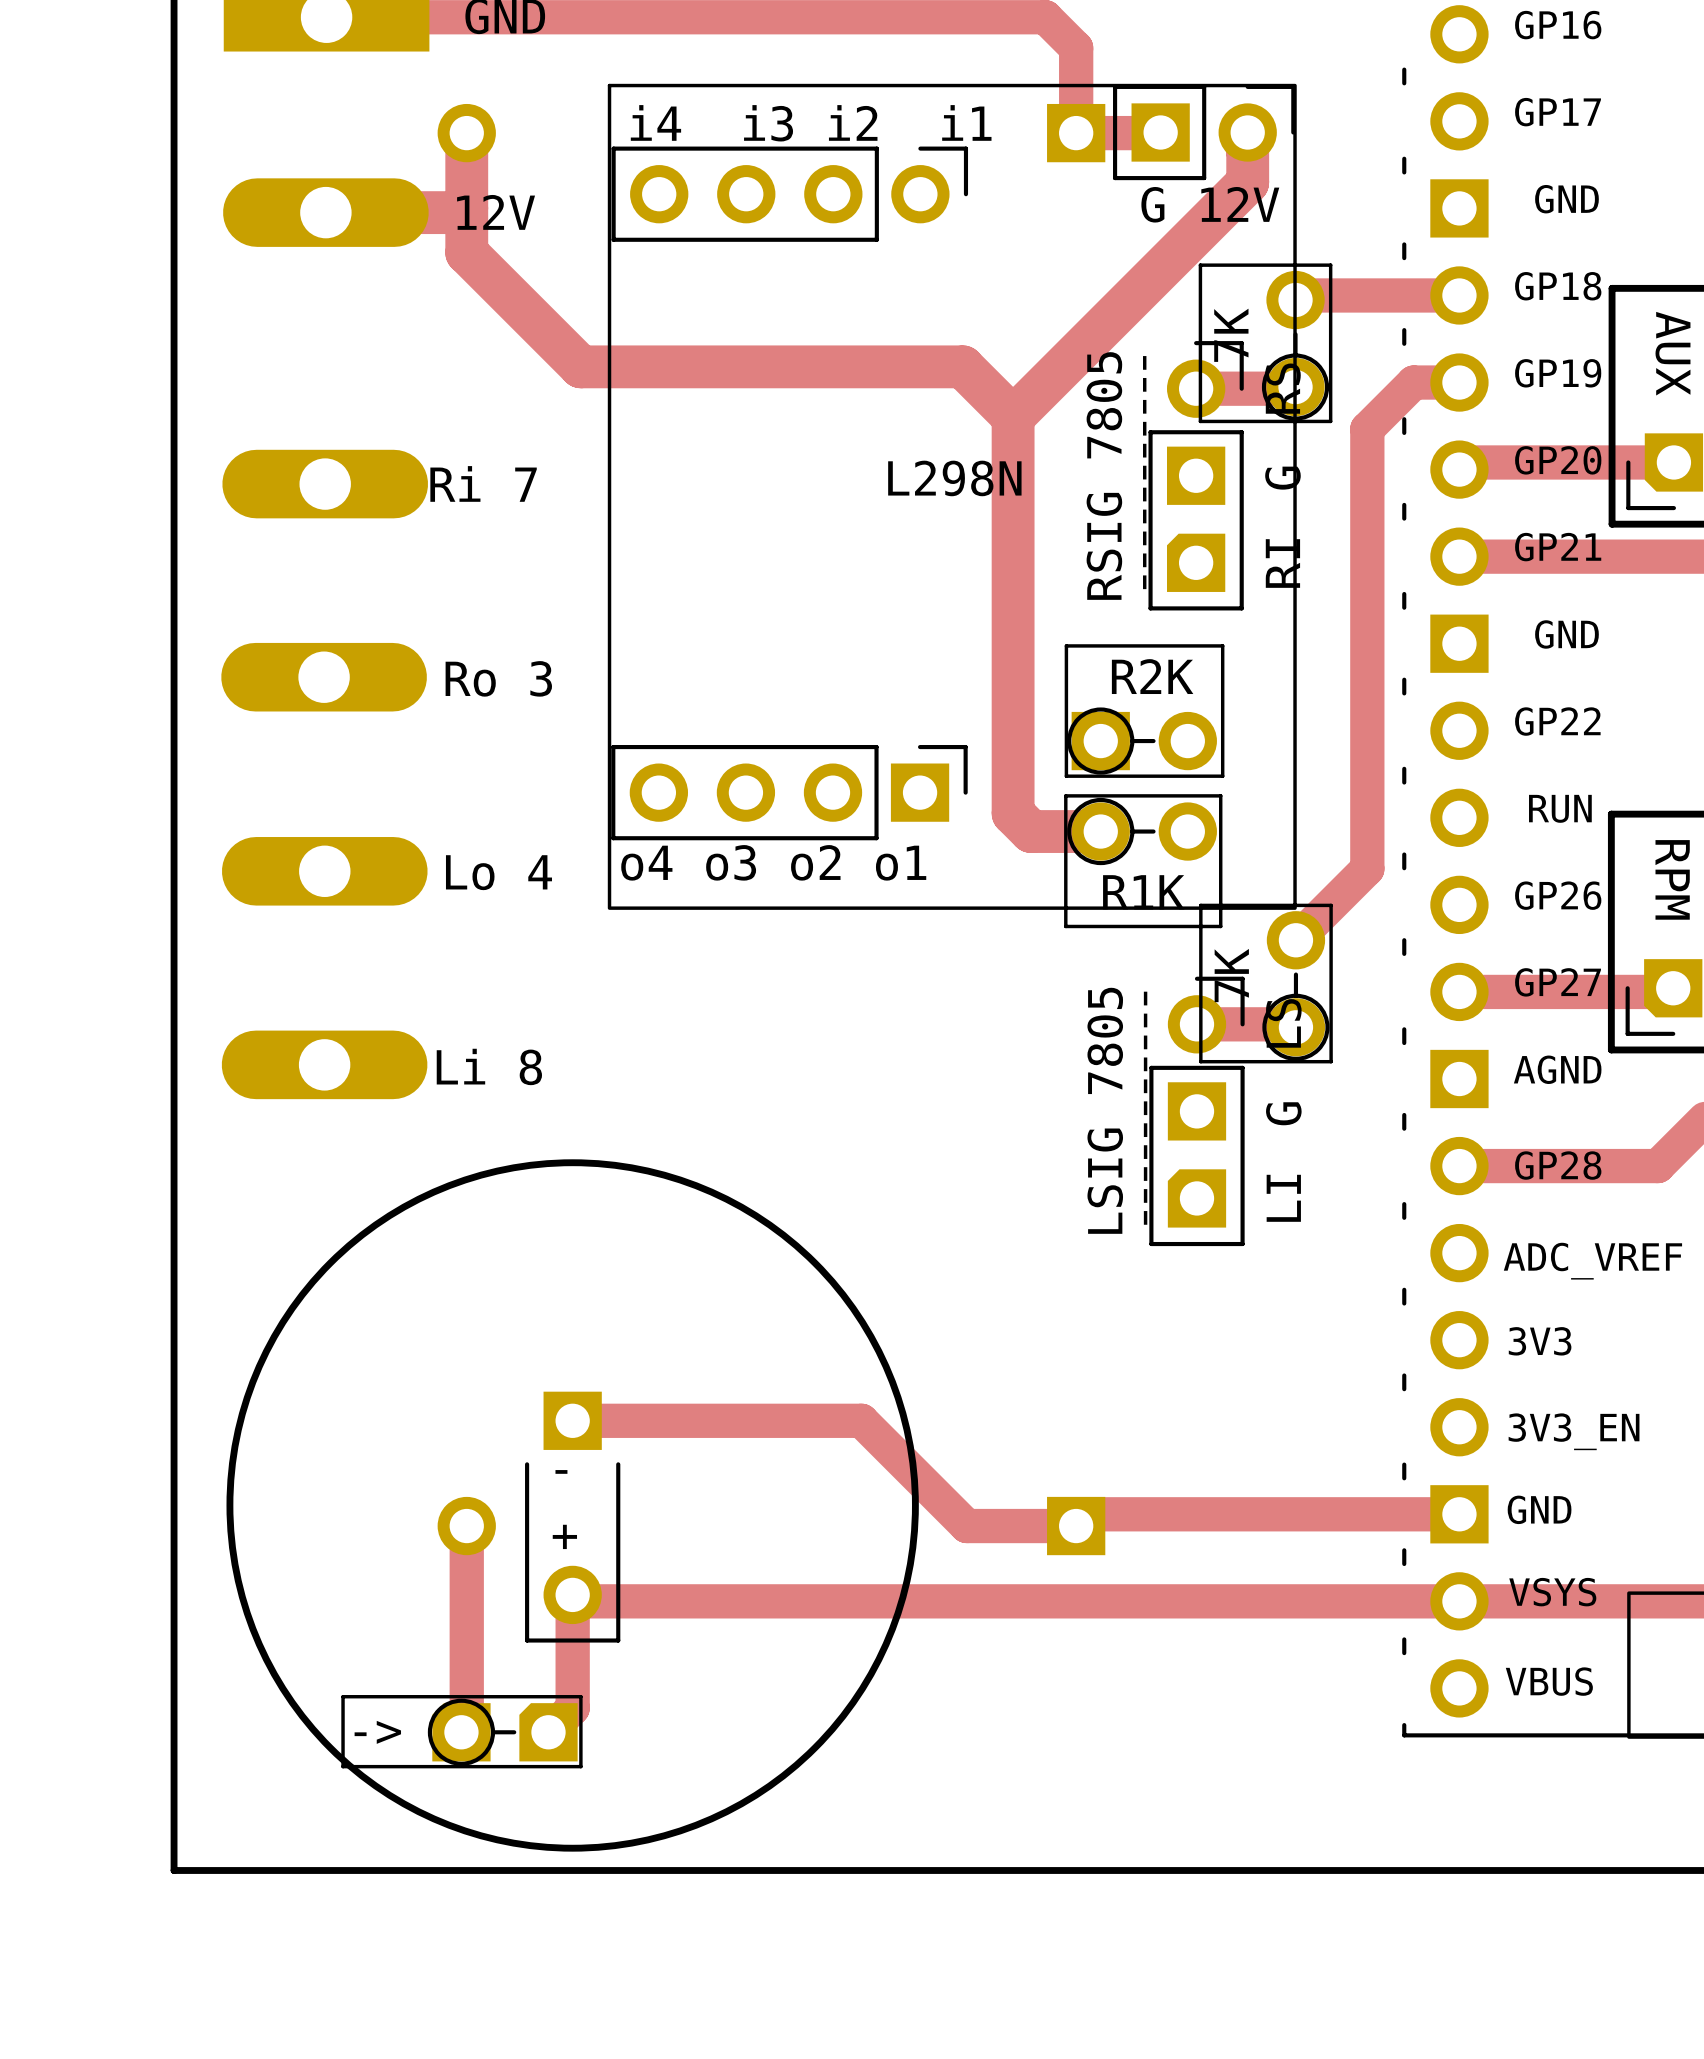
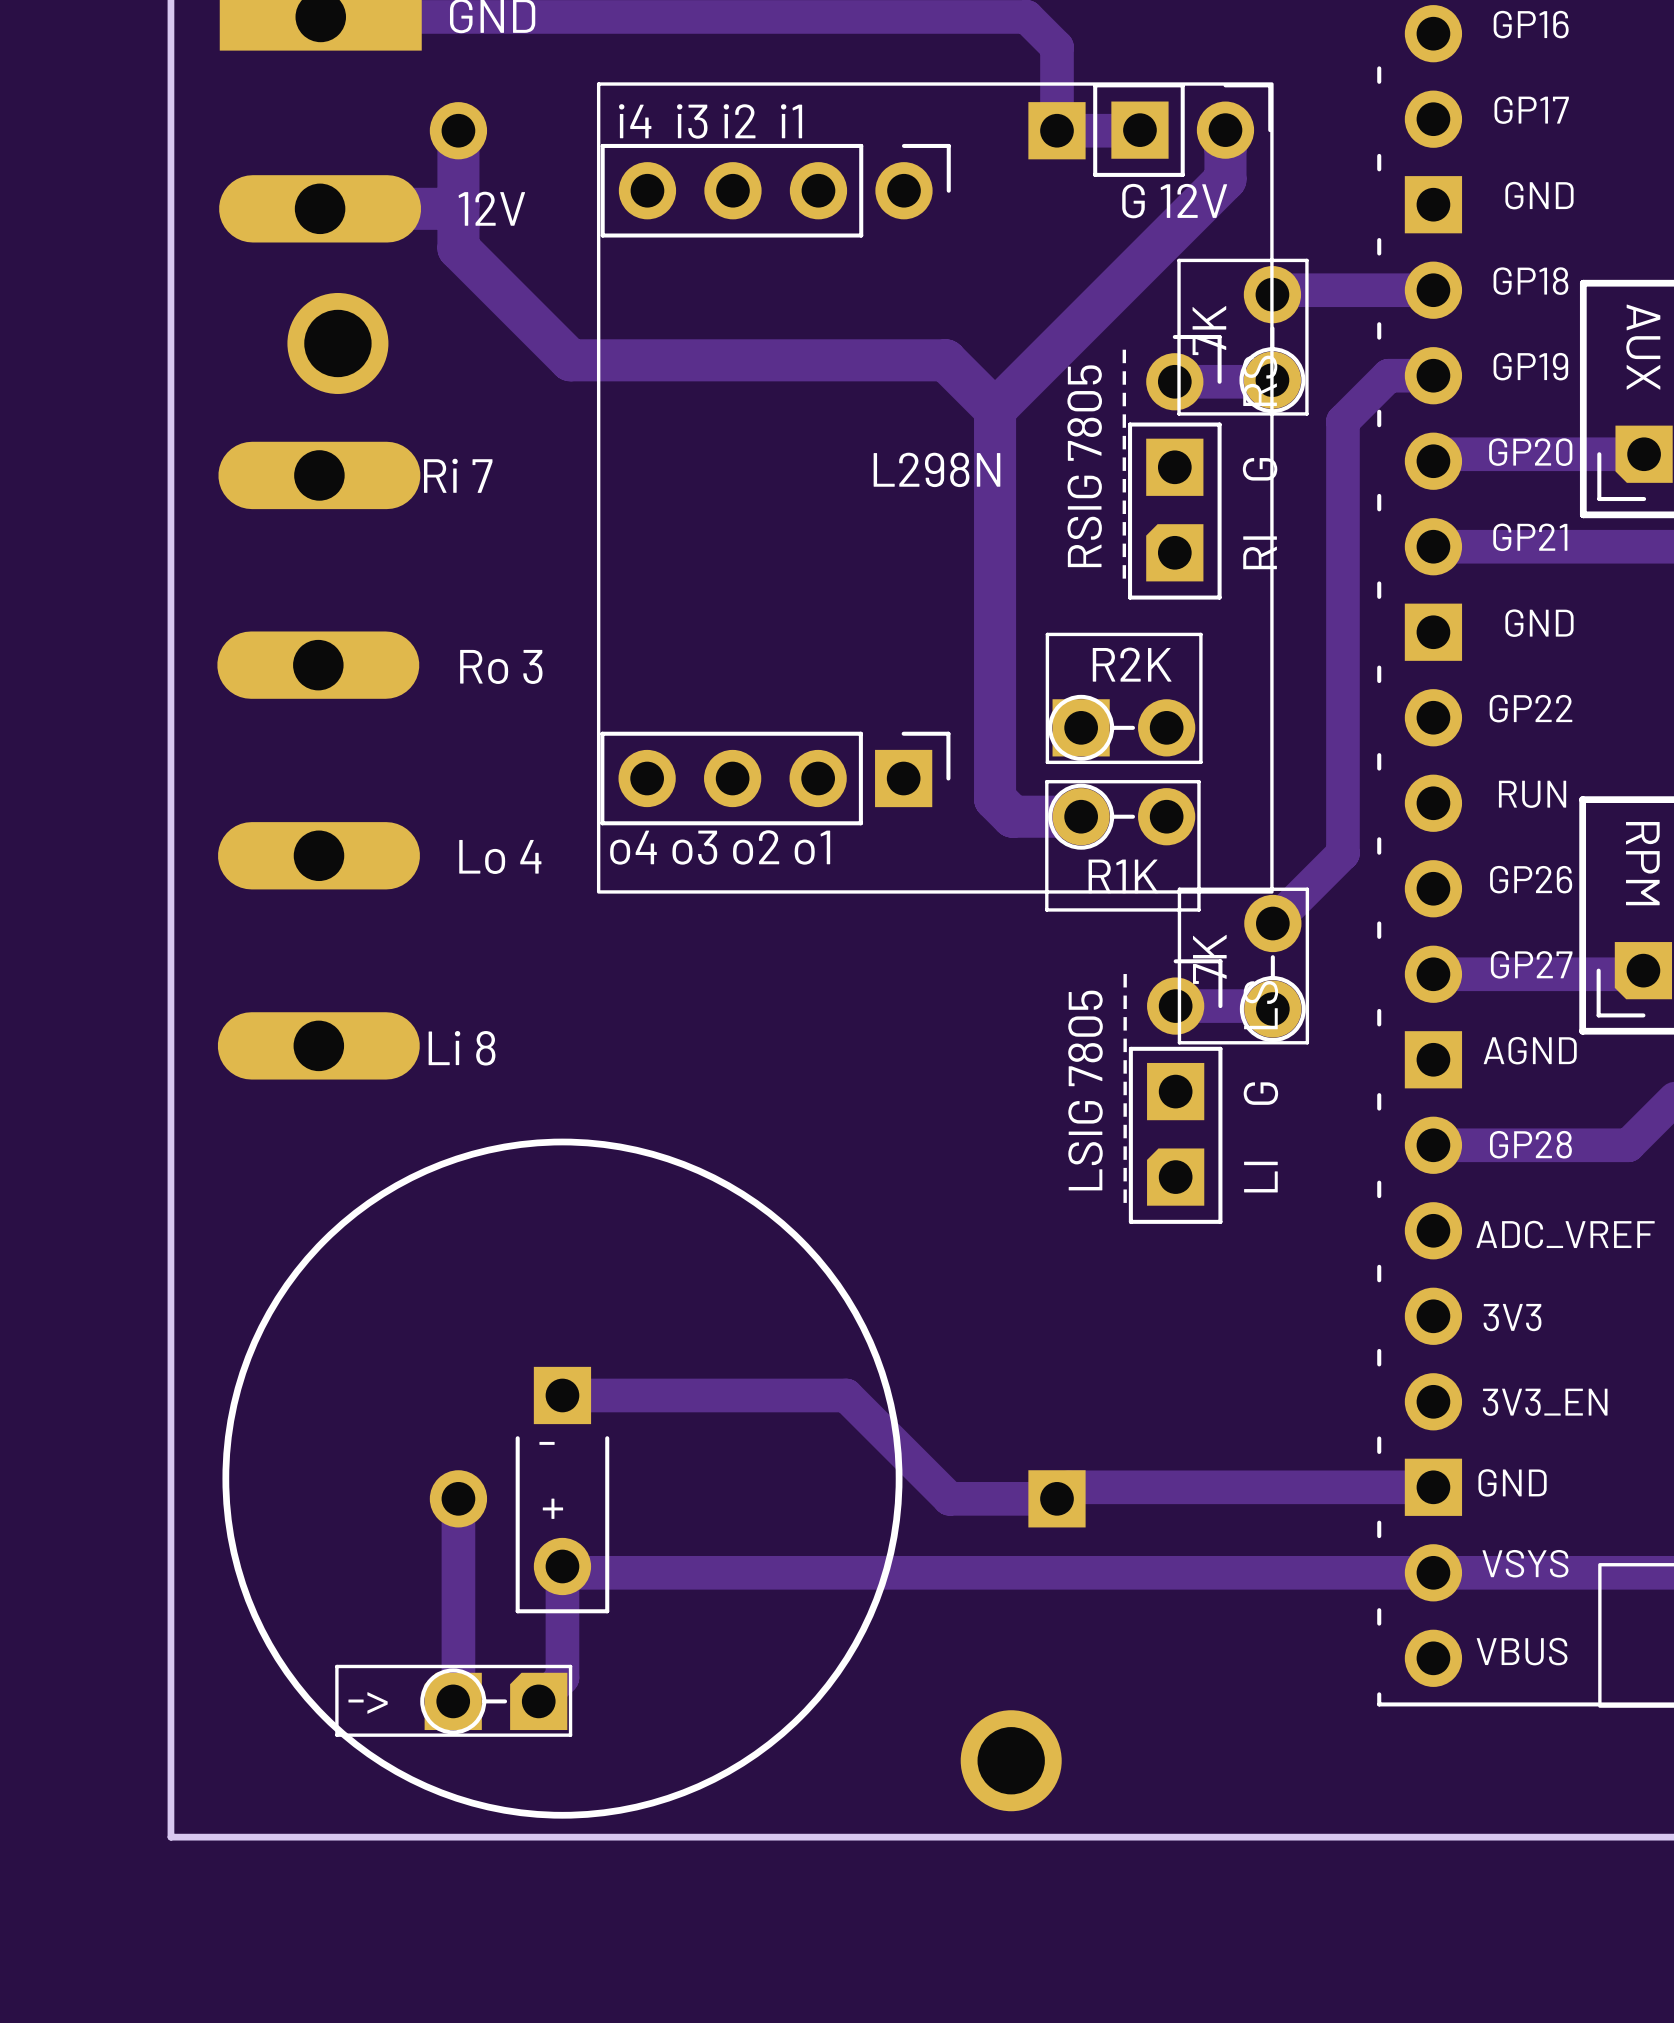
part: none -> (337, 343)
part: none -> (1011, 1760)

